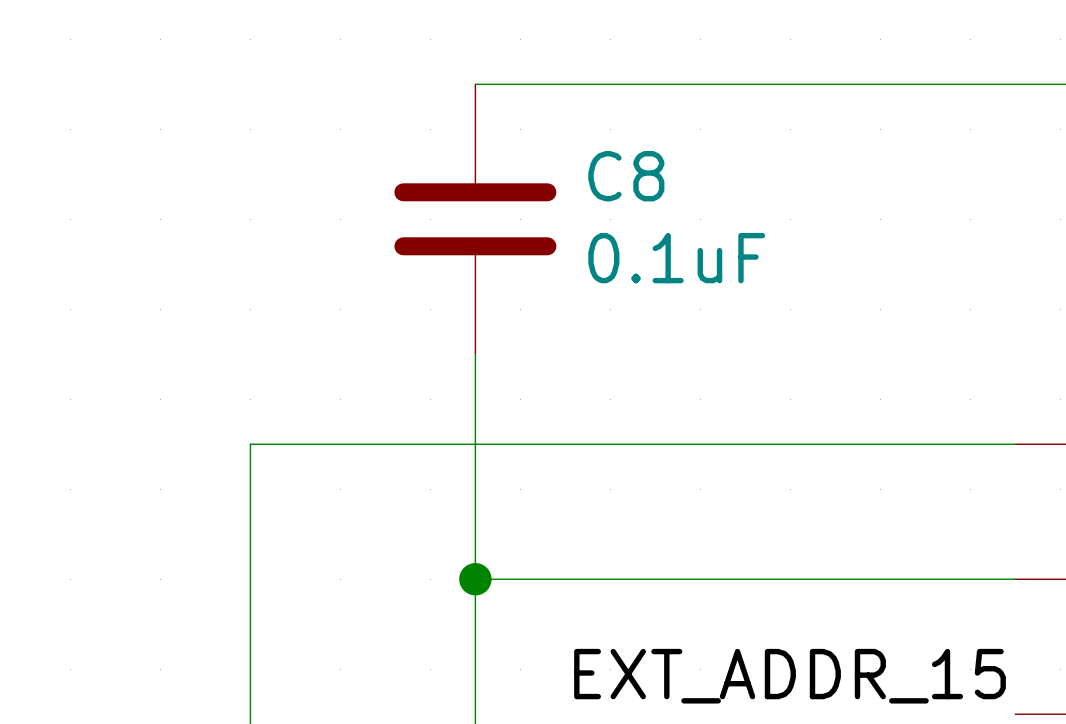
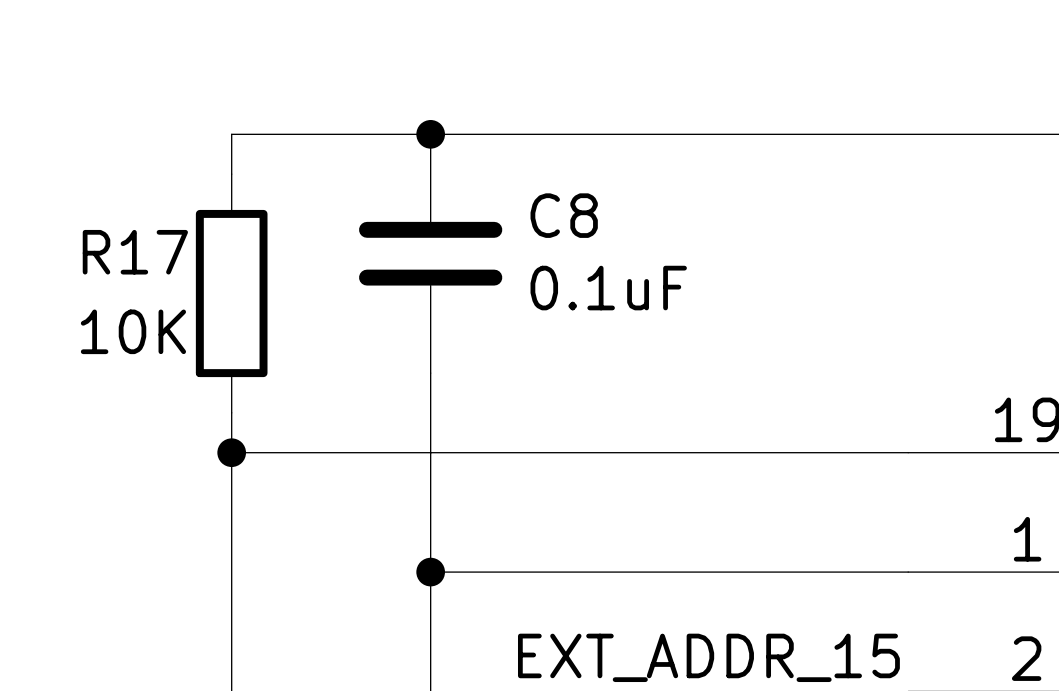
wire: none -> (430, 134) (231, 134) (231, 174)
junction: none -> (430, 134)
R17: none -> 10K (231, 293)
wire: none -> (231, 412) (231, 452)
junction: none -> (231, 452)

